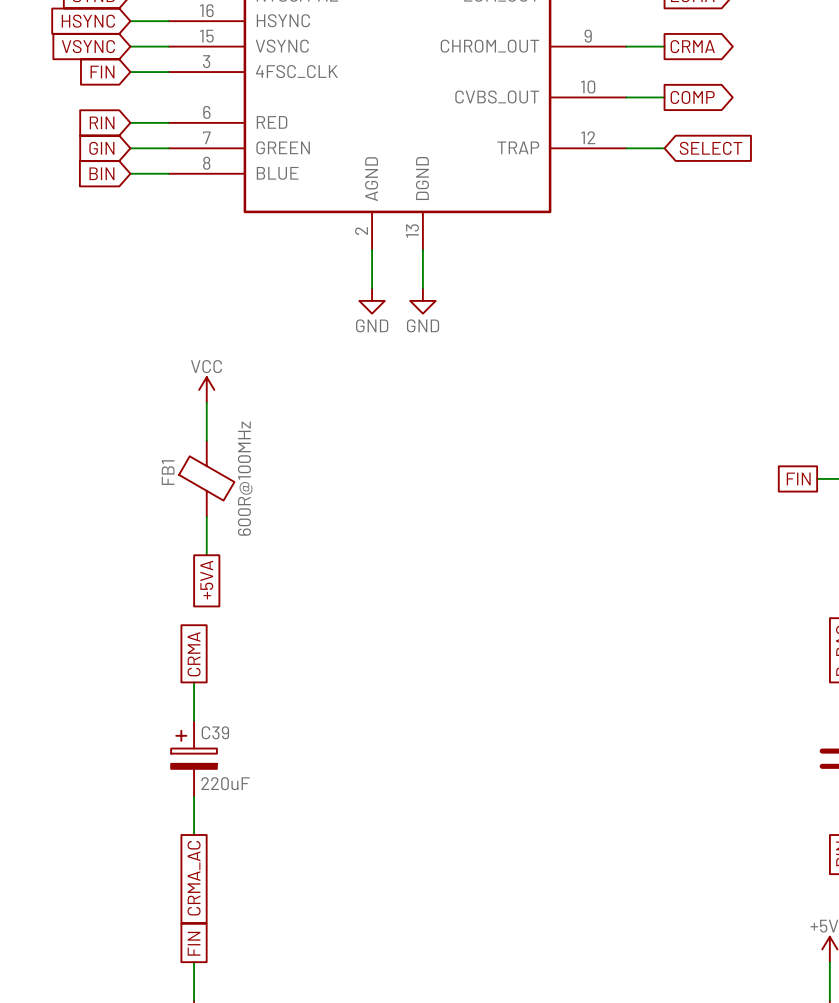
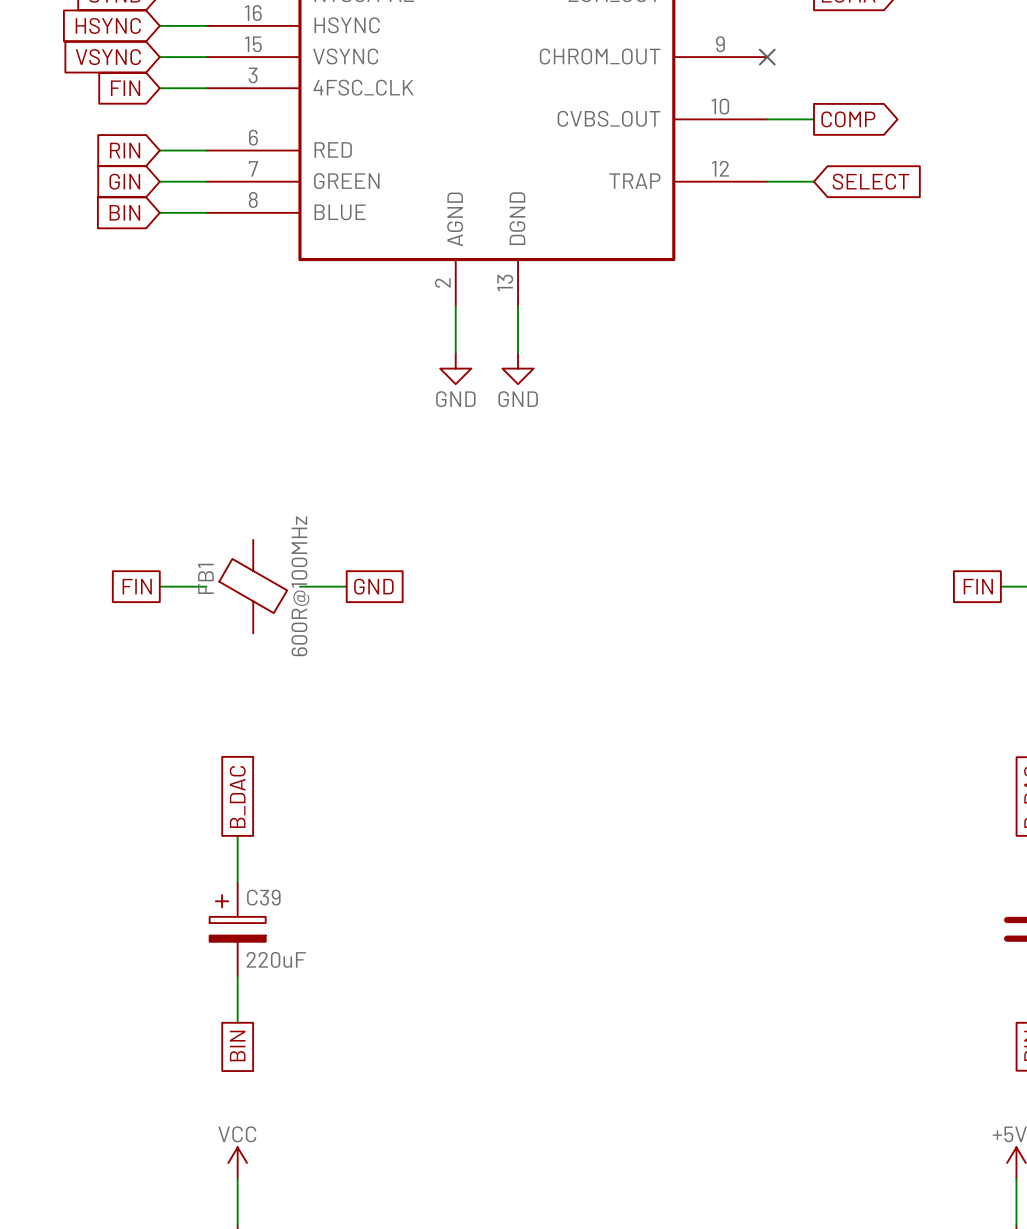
wire: (626, 46) (664, 46) -> none
no-connect mark: none -> (767, 57)
global label: CRMA (692, 46) -> none
power symbol: VCC (206, 389) -> none
wire: (206, 402) (206, 440) -> none
global label: none -> FIN (137, 586)
wire: none -> (159, 586) (206, 586)
wire: none -> (299, 586) (346, 586)
global label: none -> GND (373, 586)
wire: (206, 517) (206, 555) -> none
global label: +5VA (206, 580) -> none
global label: CRMA (194, 654) -> B_DAC (237, 796)
global label: CRMA_AC (194, 878) -> BIN (237, 1046)
global label: FIN (194, 943) -> none
power symbol: none -> VCC (237, 1162)

